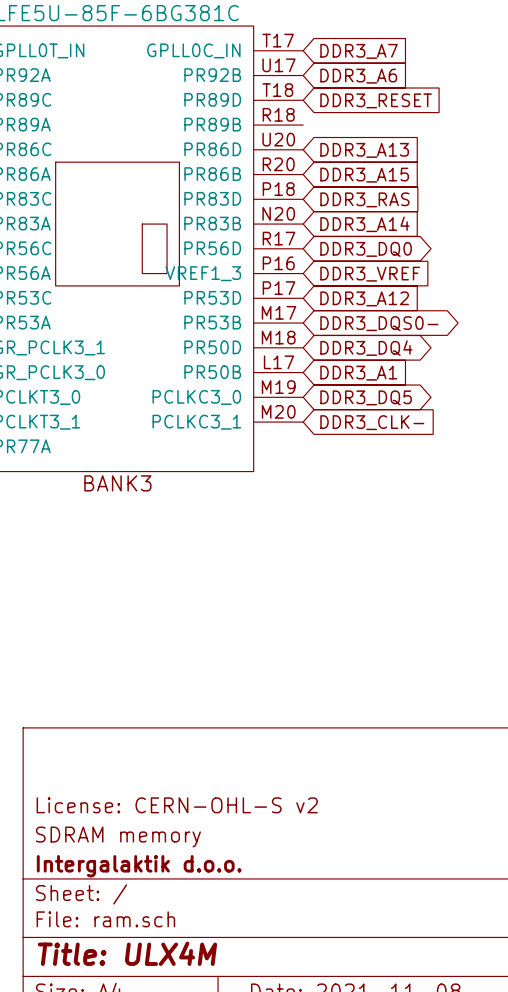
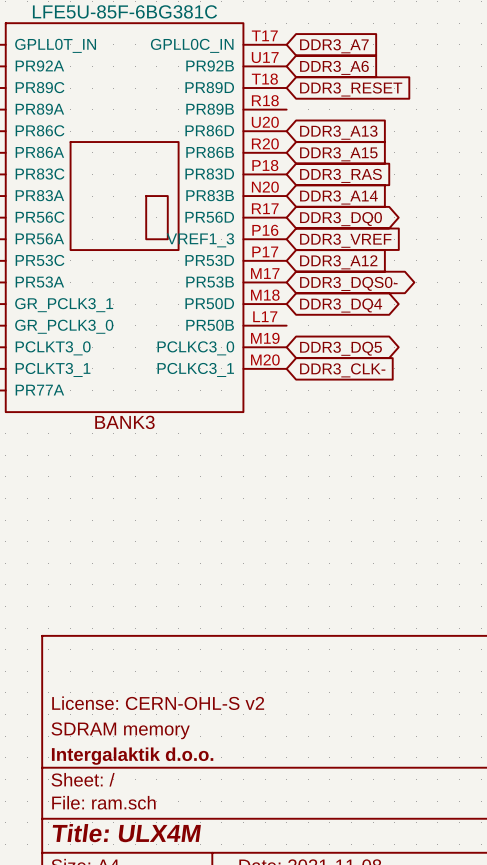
global label: DDR3_A1 (358, 373) -> none

